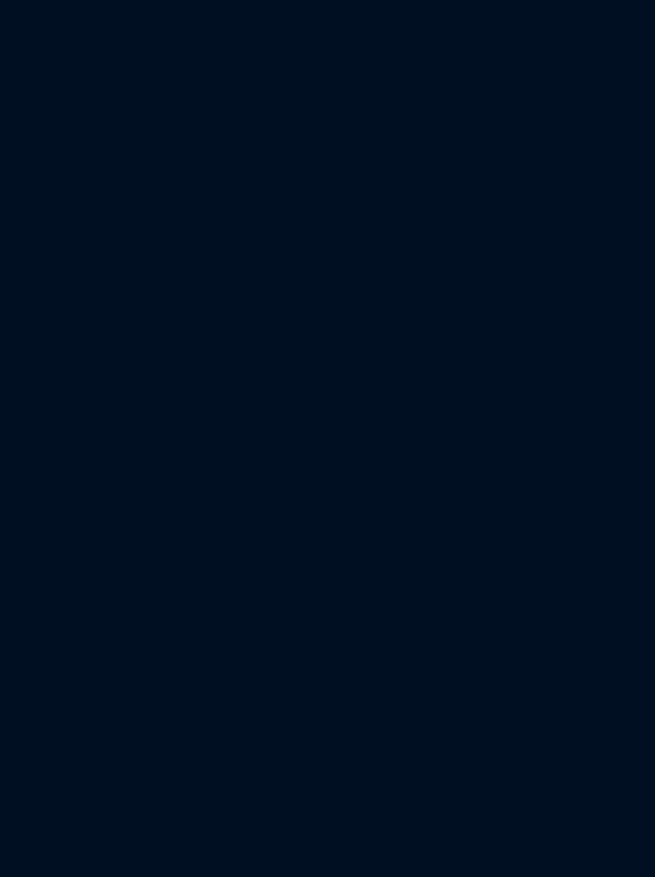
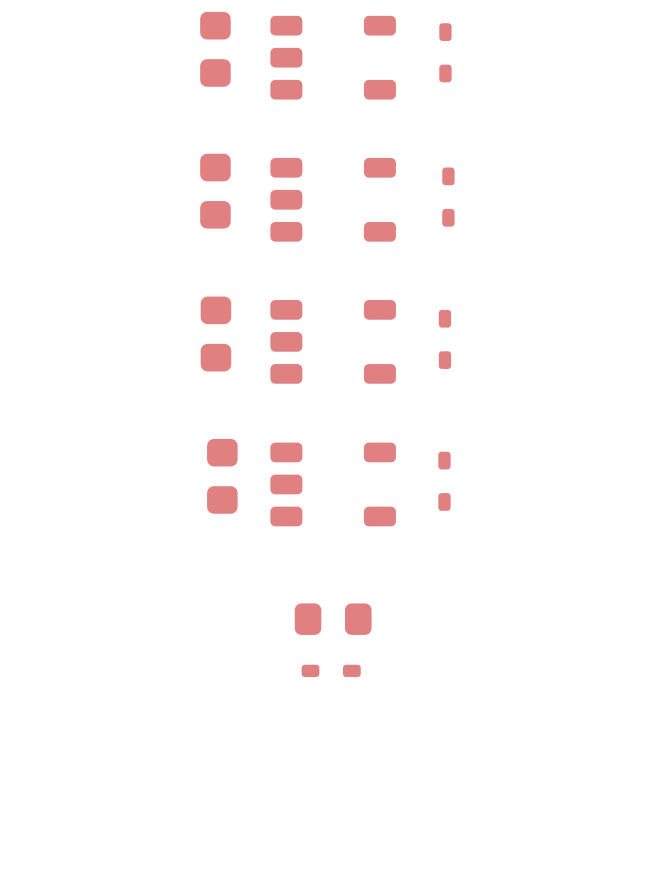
part: none -> (215, 49)
part: none -> (445, 52)
part: none -> (333, 57)
part: none -> (215, 191)
part: none -> (448, 197)
part: none -> (333, 199)
part: none -> (215, 334)
part: none -> (444, 339)
part: none -> (333, 341)
part: none -> (222, 476)
part: none -> (444, 481)
part: none -> (333, 484)
part: none -> (333, 619)
part: none -> (331, 670)

